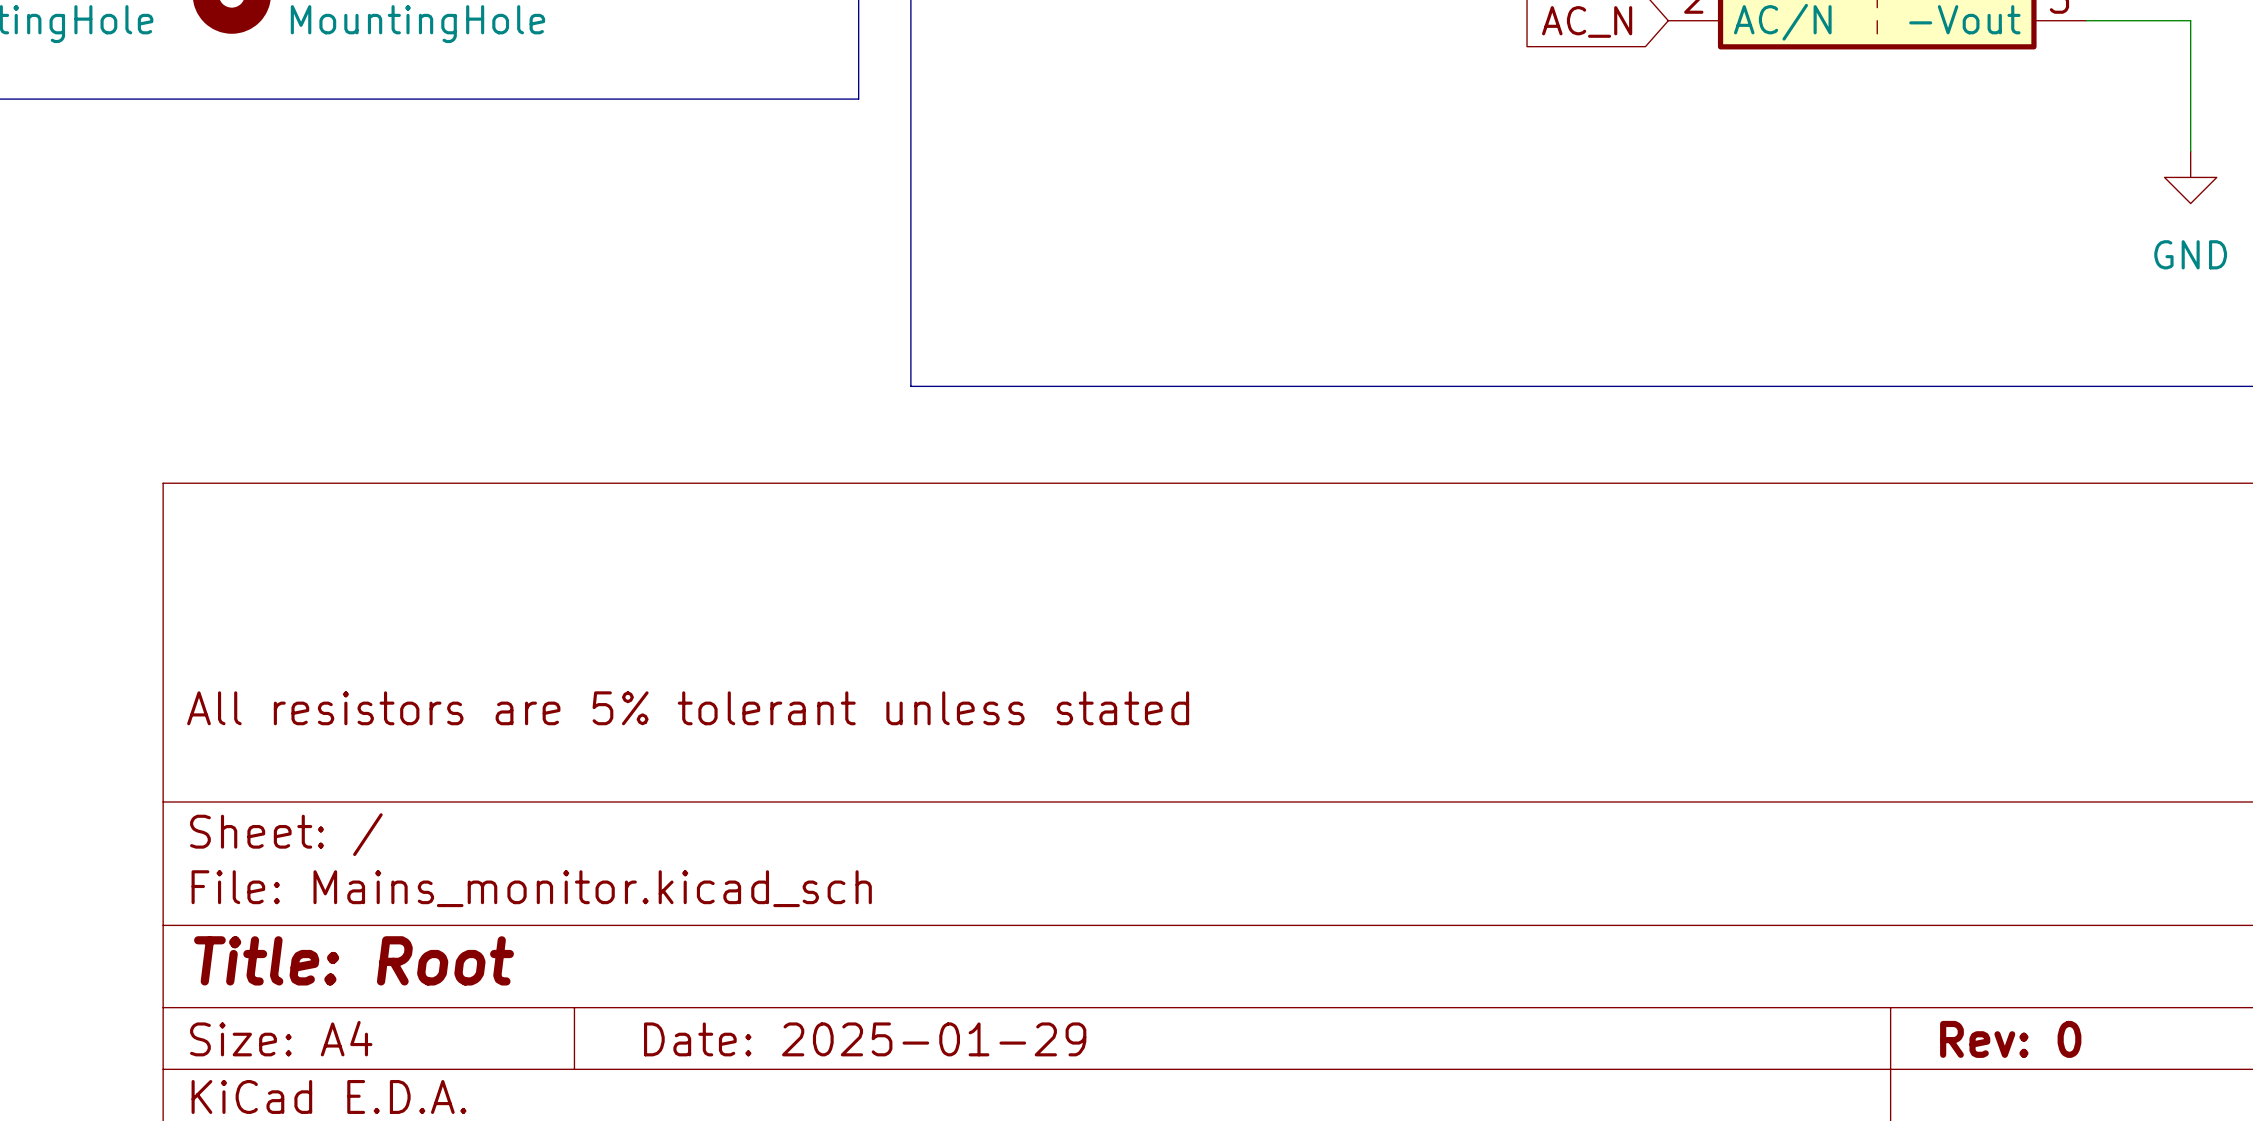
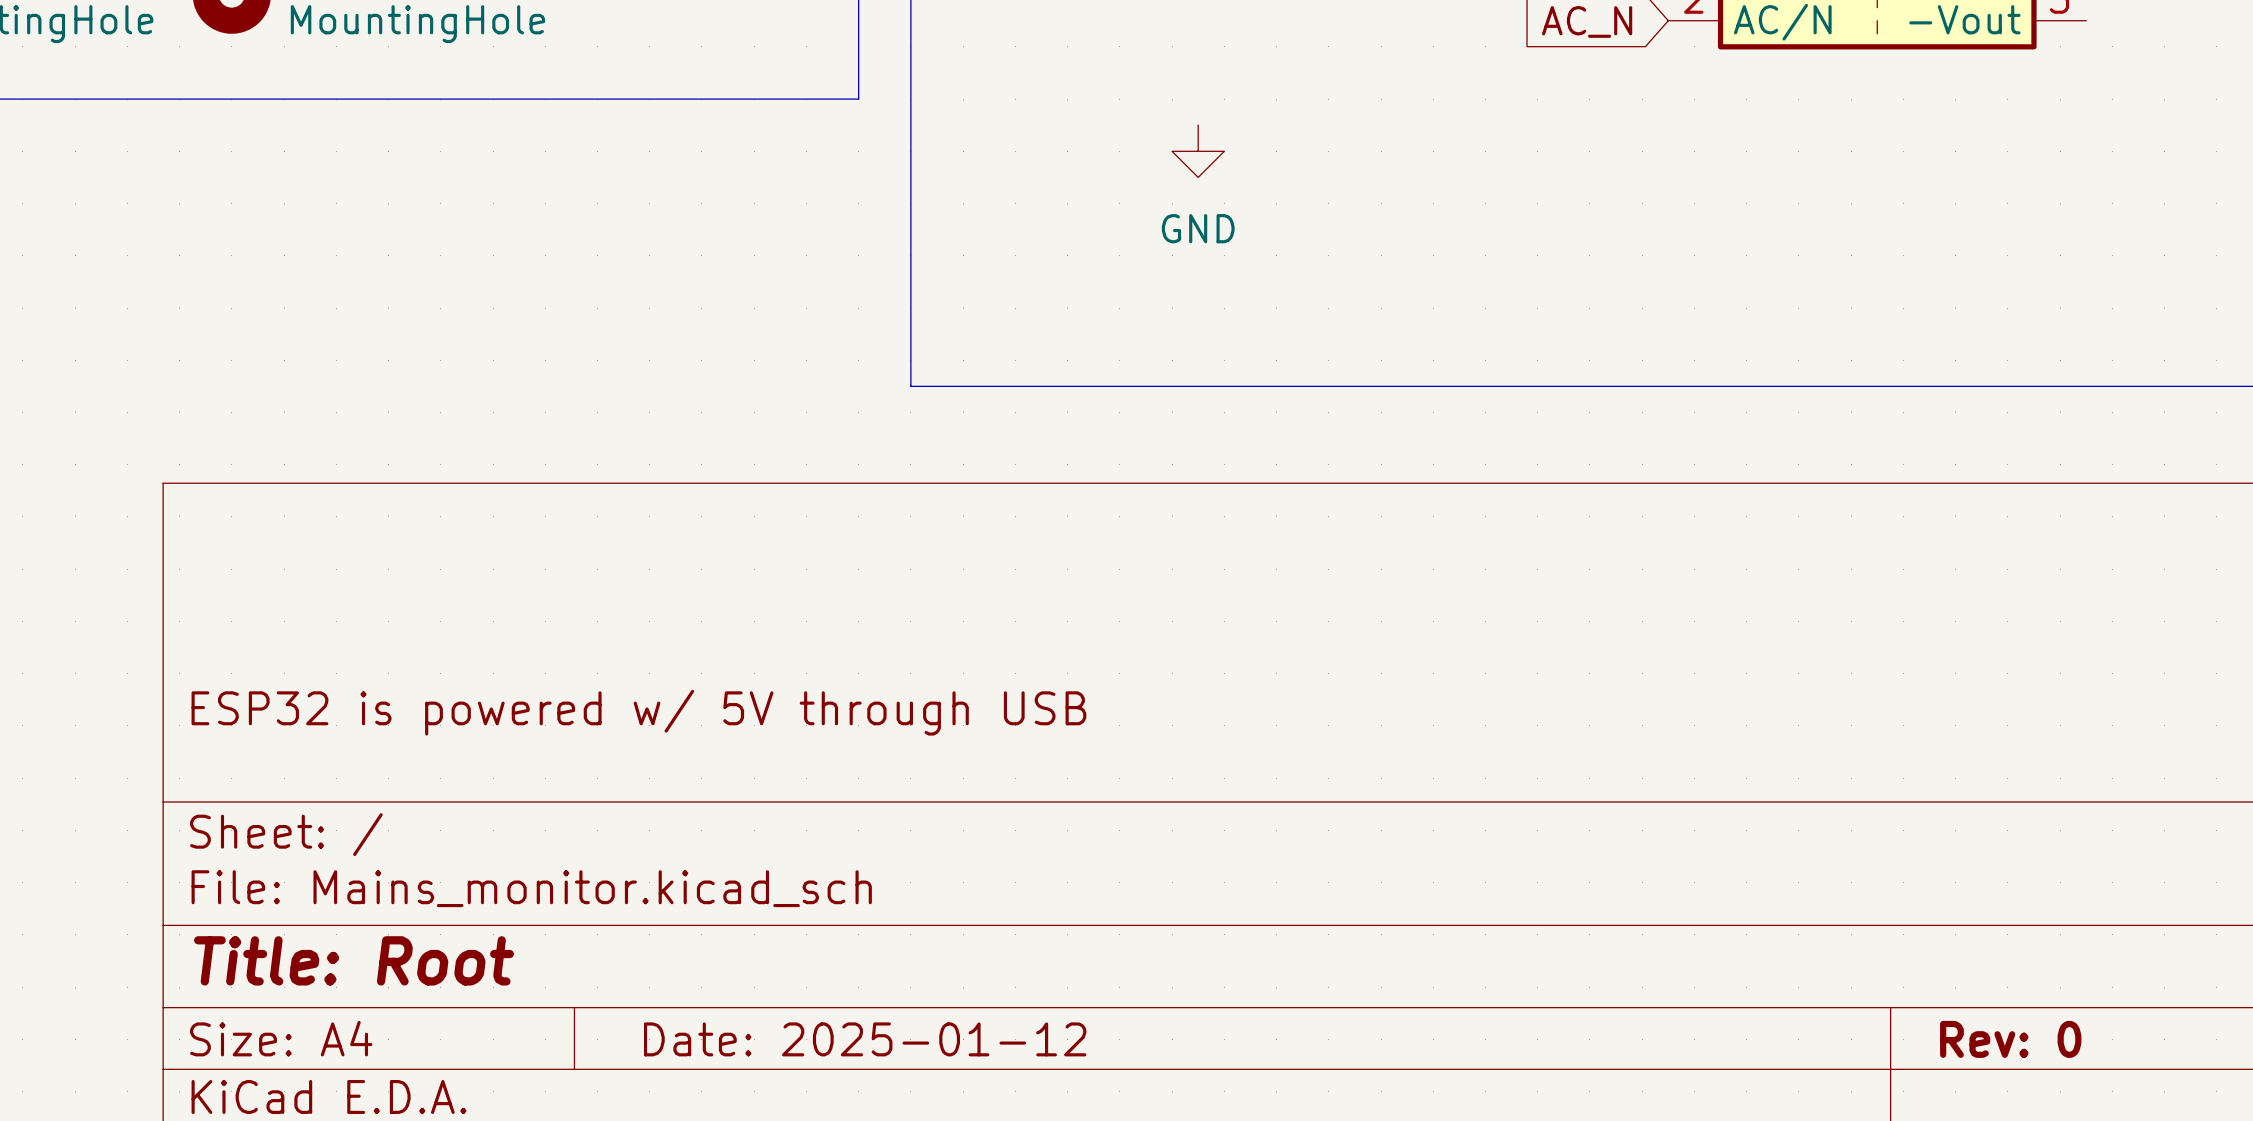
wire: (2086, 20) (2190, 20) (2190, 151) -> none
power symbol: none -> GND (1198, 151)
power symbol: GND (2190, 177) -> none
title block: All resistors are 5% tolerant unless stated (688, 708) -> ESP32 is powered w/ 5V through USB (638, 712)
title block: Date: 2025-01-29 (865, 1039) -> Date: 2025-01-12 (865, 1039)

